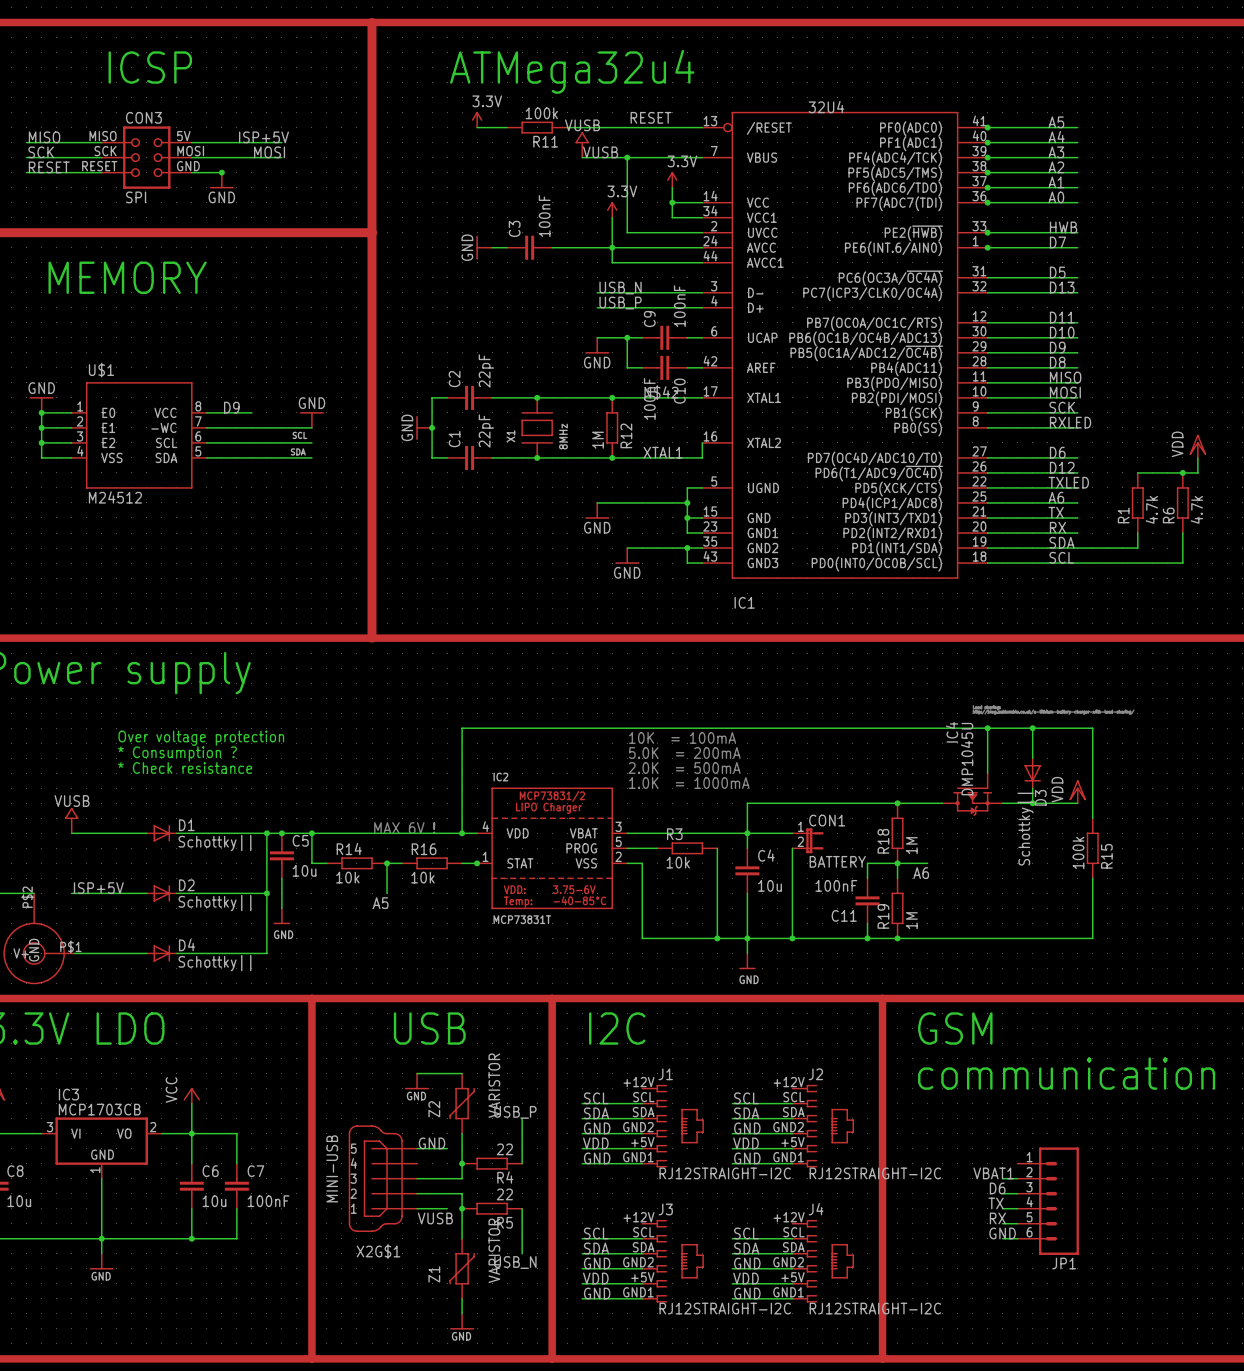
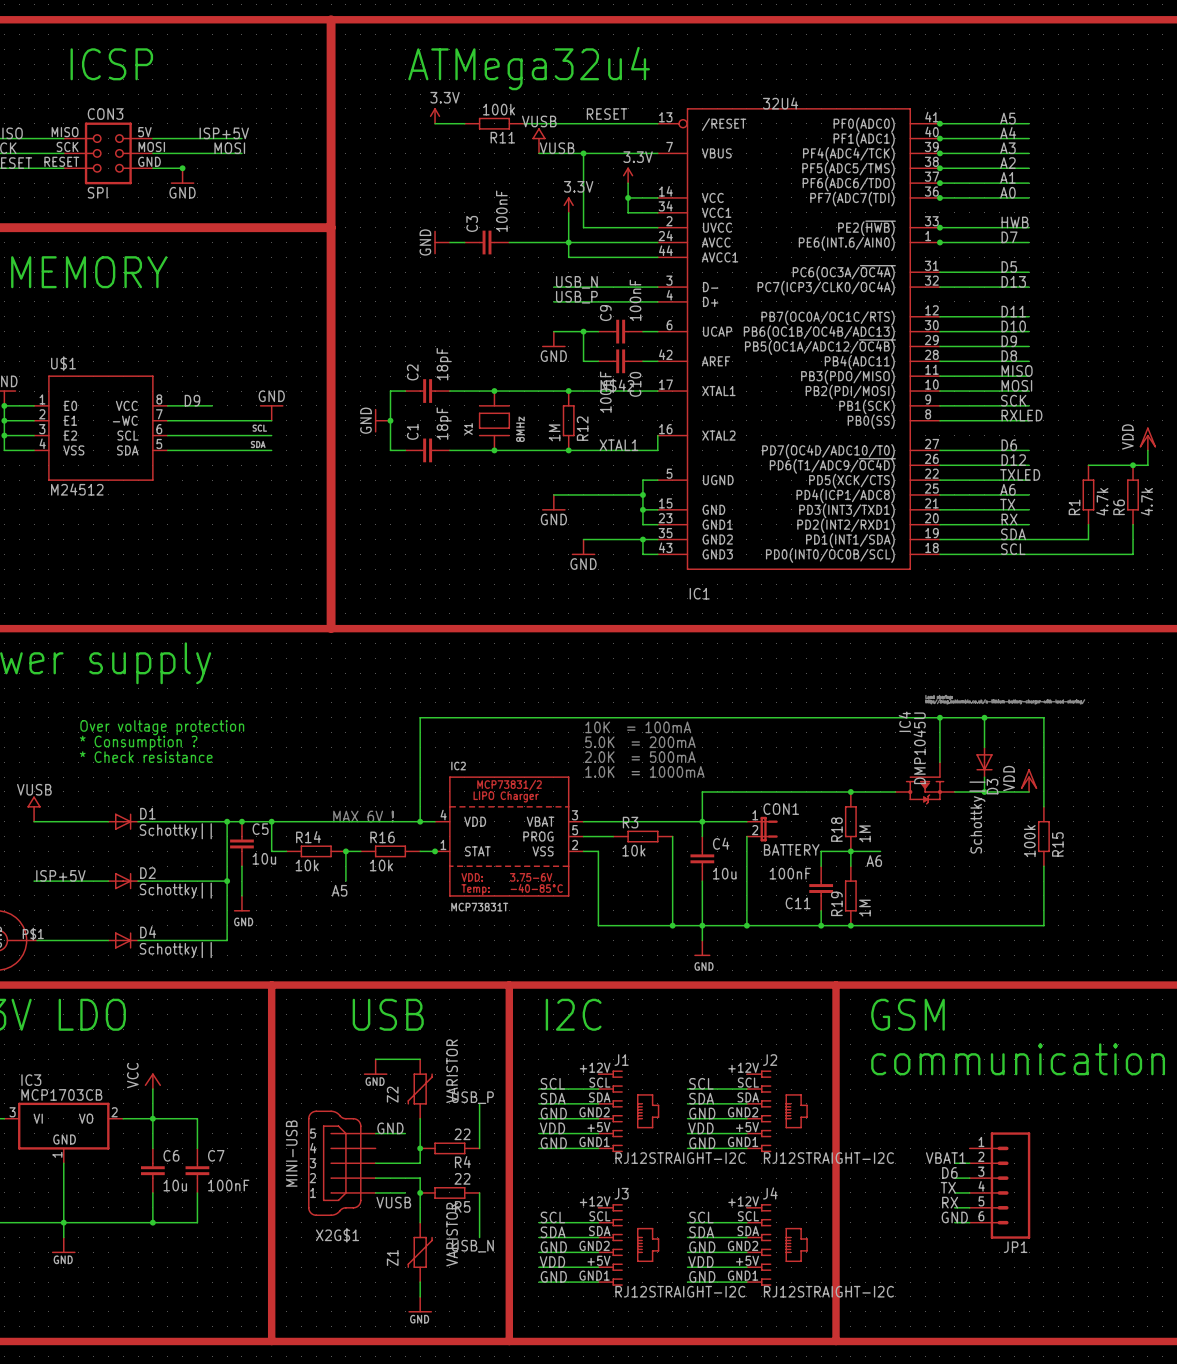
C2 value: 22pF (486, 370) -> 18pF (444, 364)
C1 value: 22pF (486, 431) -> 18pF (444, 423)

